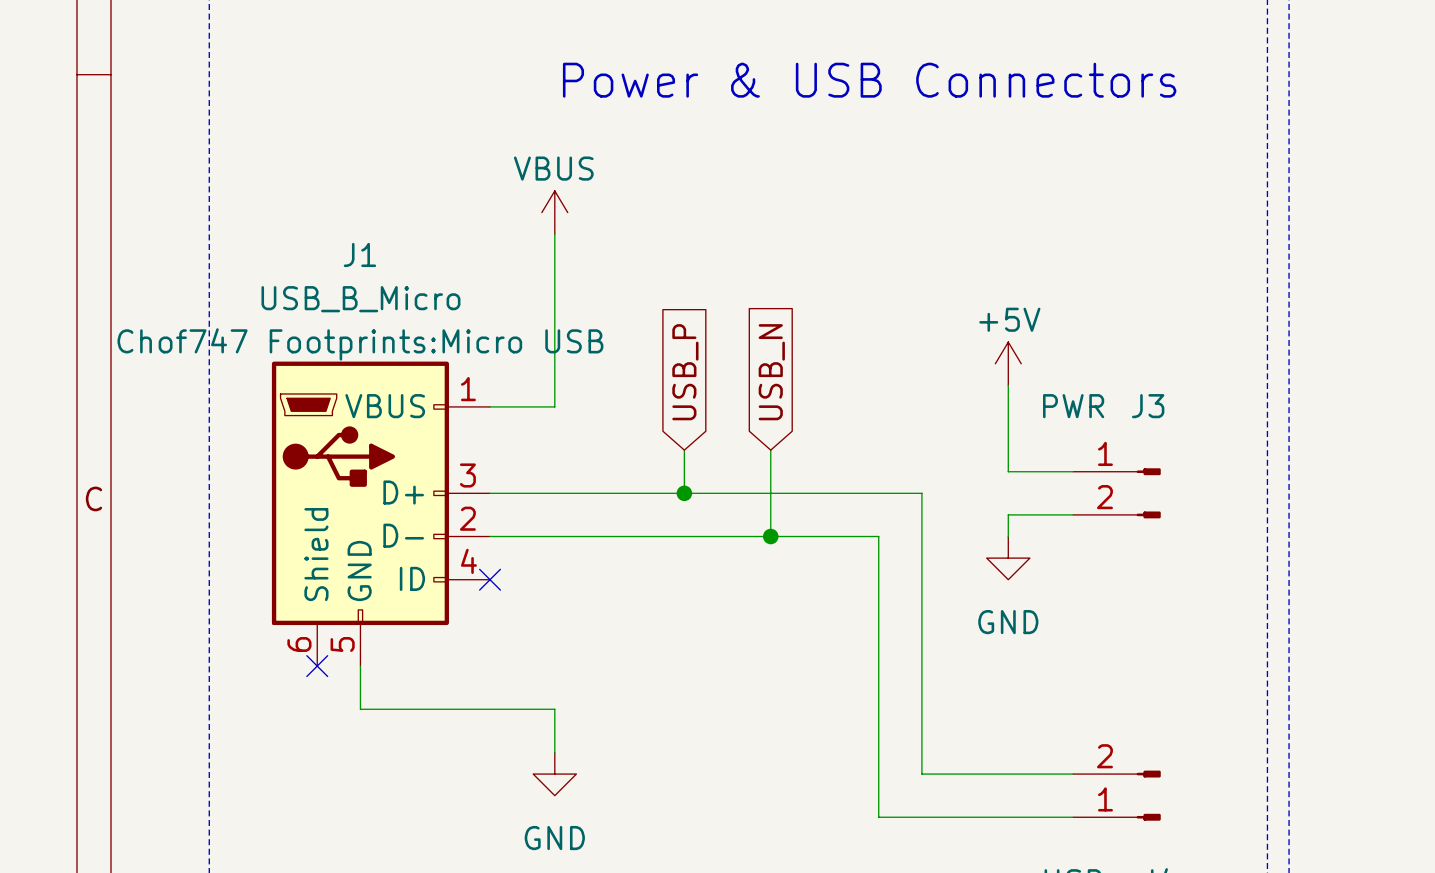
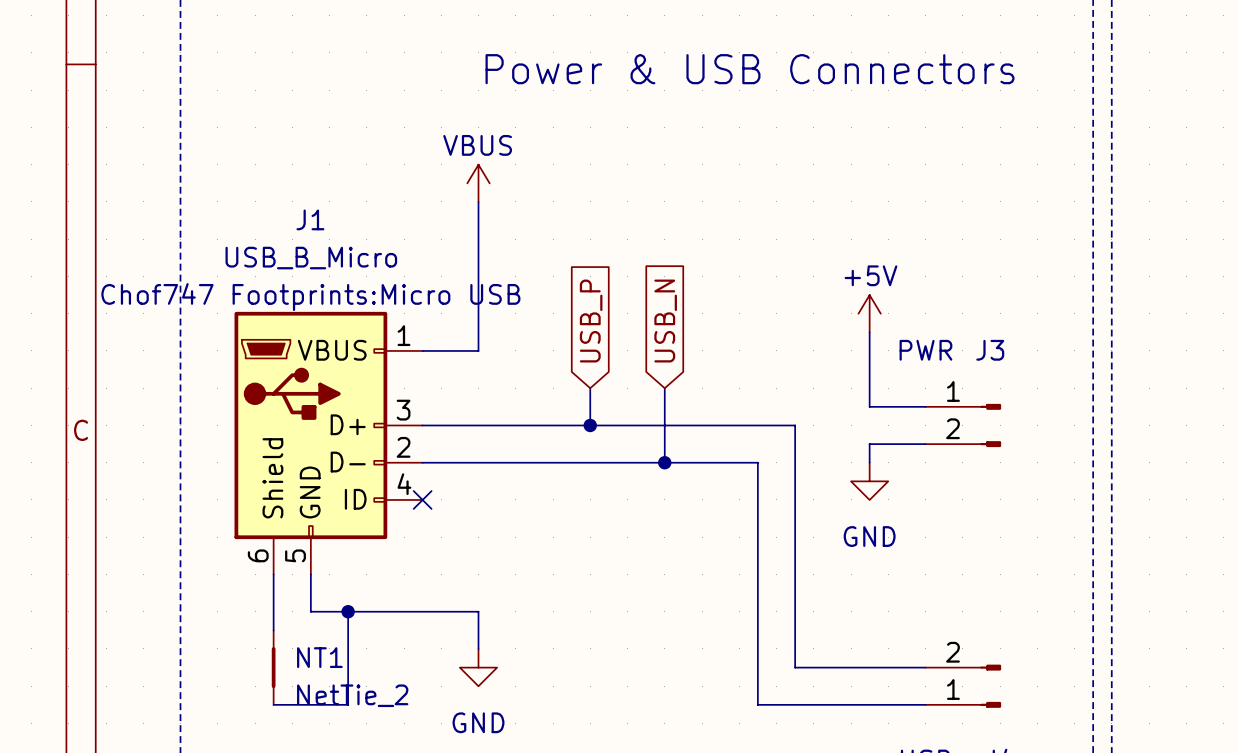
wire: none -> (273, 574) (273, 630)
no-connect mark: (317, 666) -> none
wire: none -> (348, 611) (348, 704) (273, 704)
junction: none -> (348, 611)
NT1: none -> NetTie_2 (273, 667)

